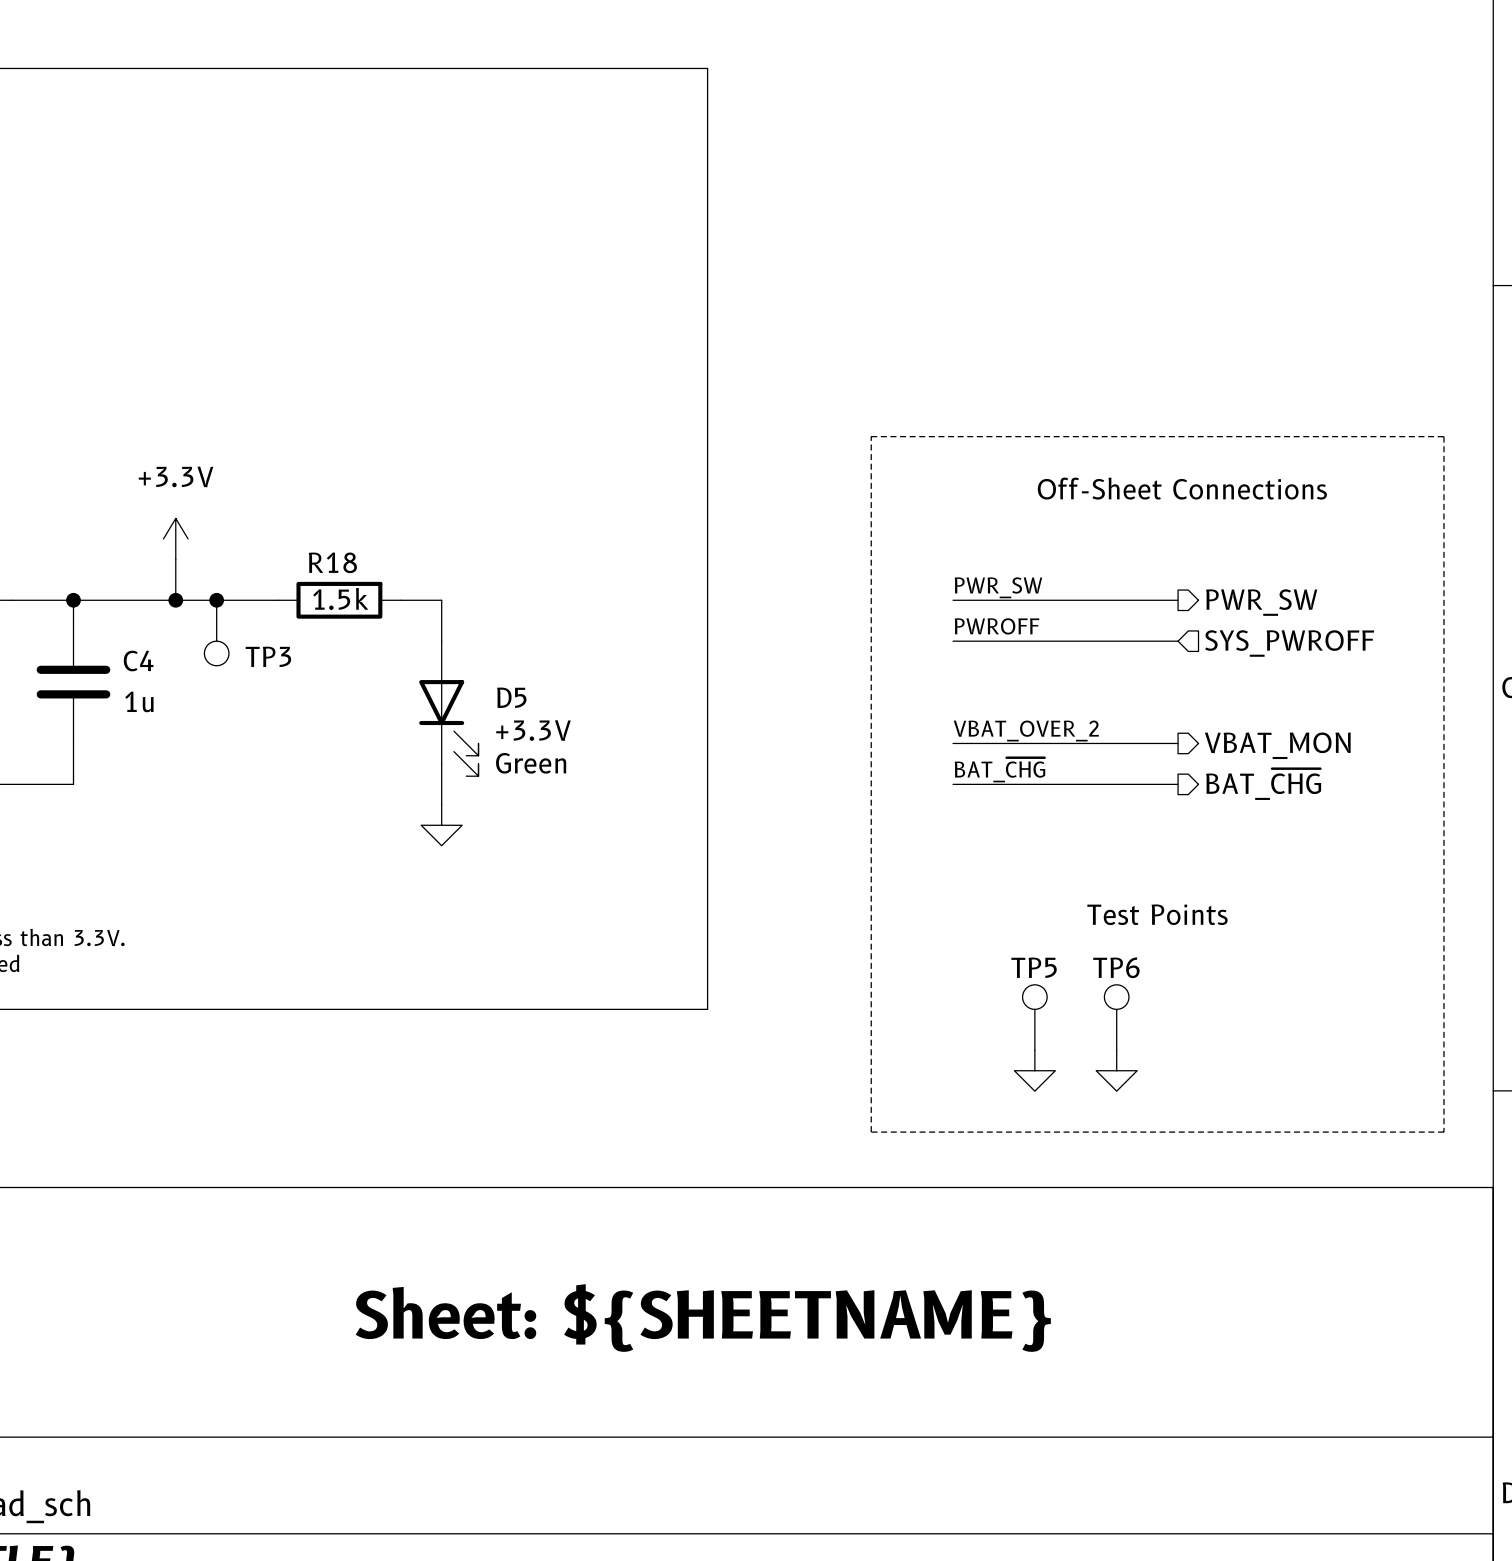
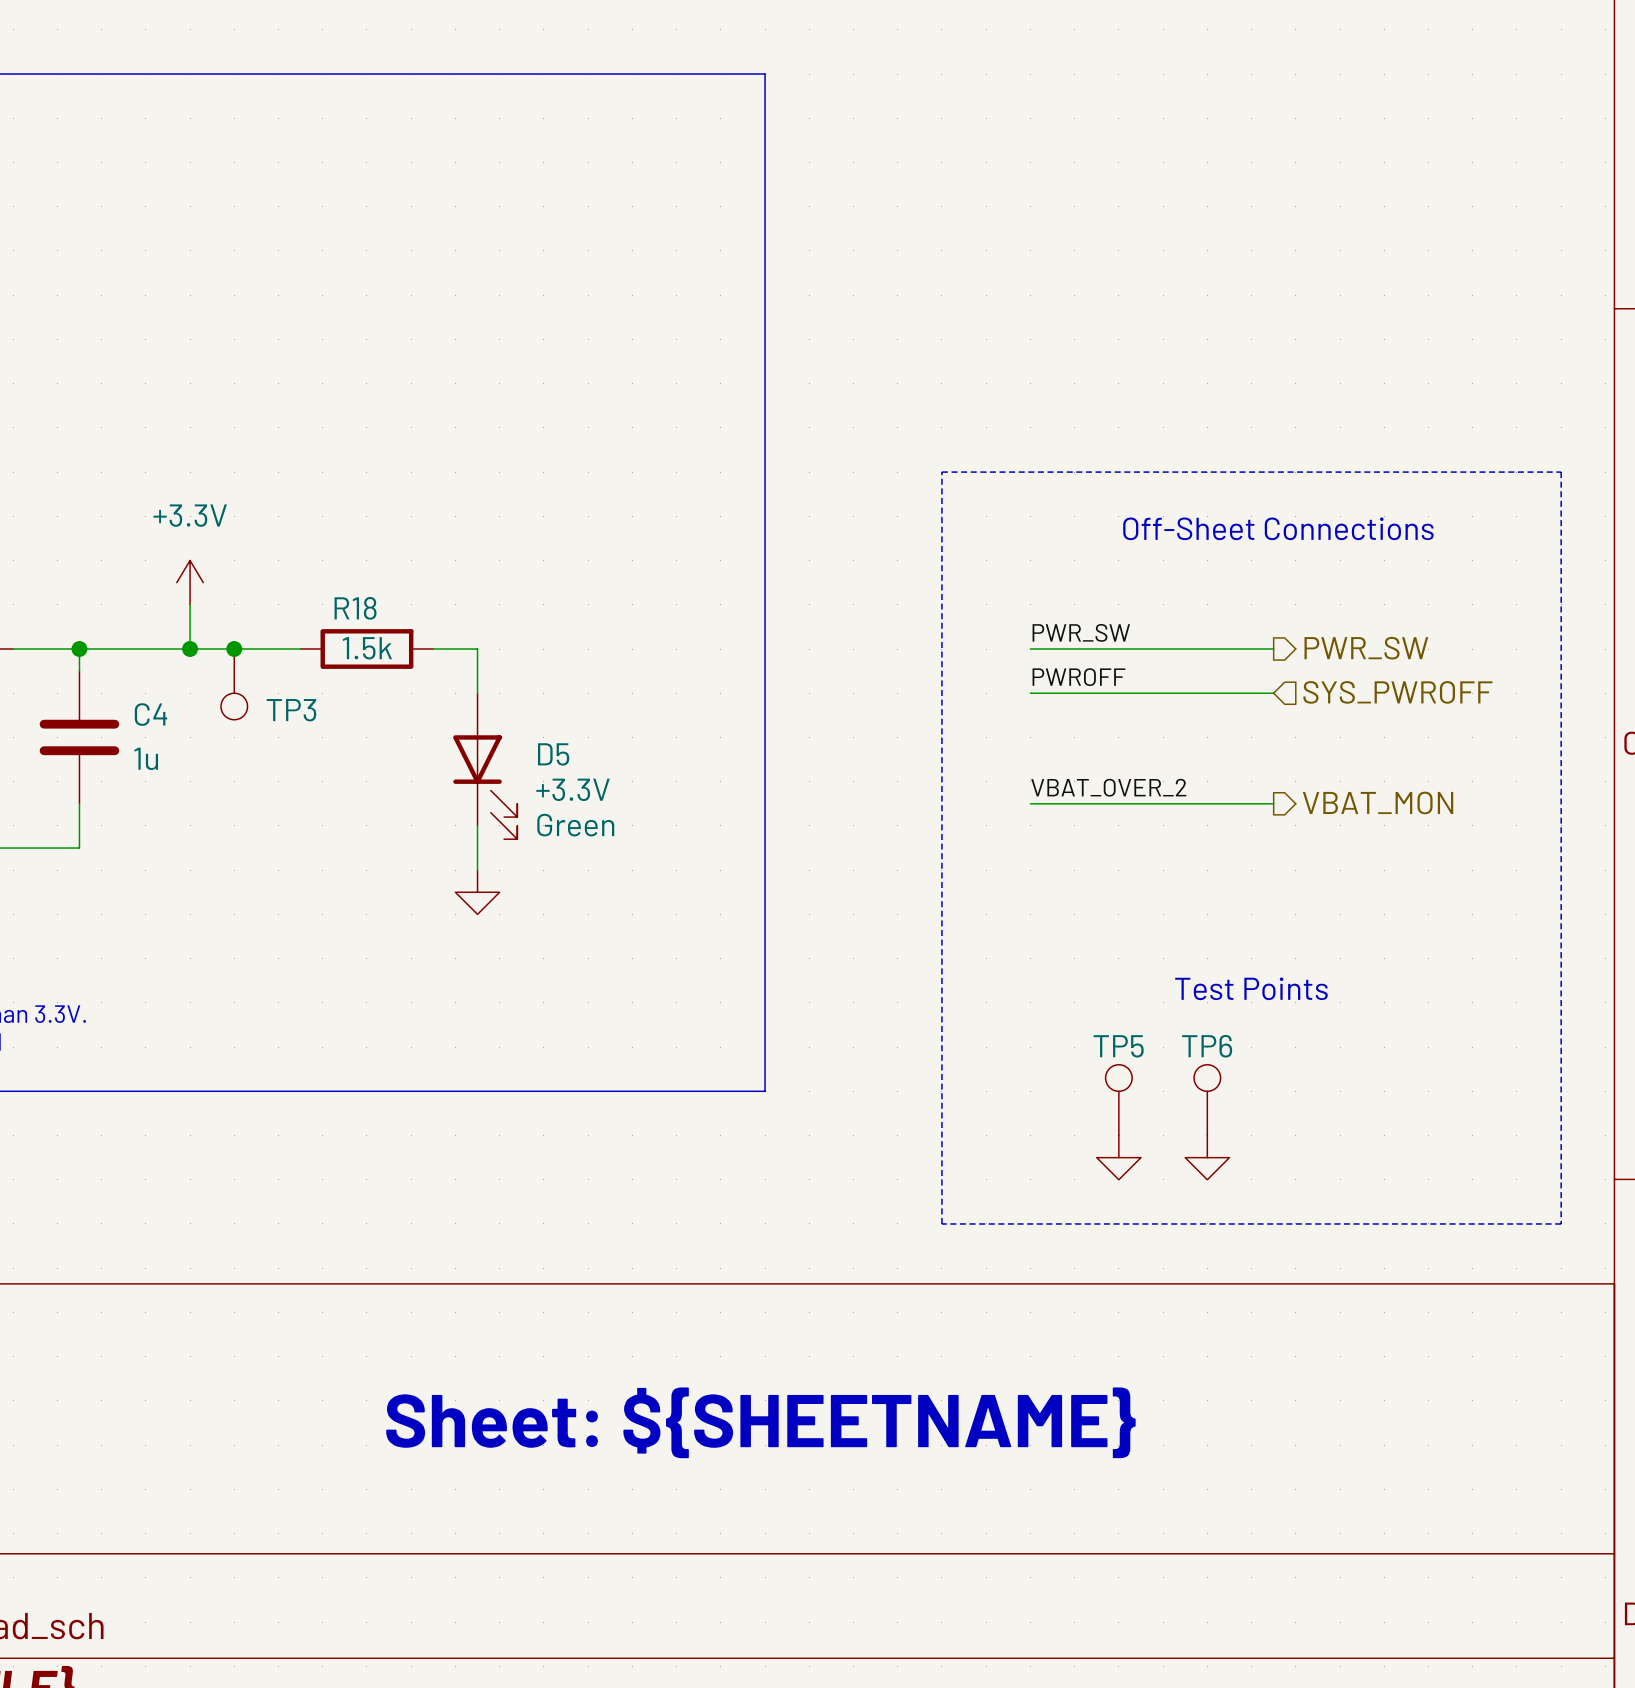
label: BAT_~{CHG} (999, 770) -> none
wire: (953, 784) (1178, 784) -> none
hierarchical label: BAT_~{CHG} (1263, 784) -> none

